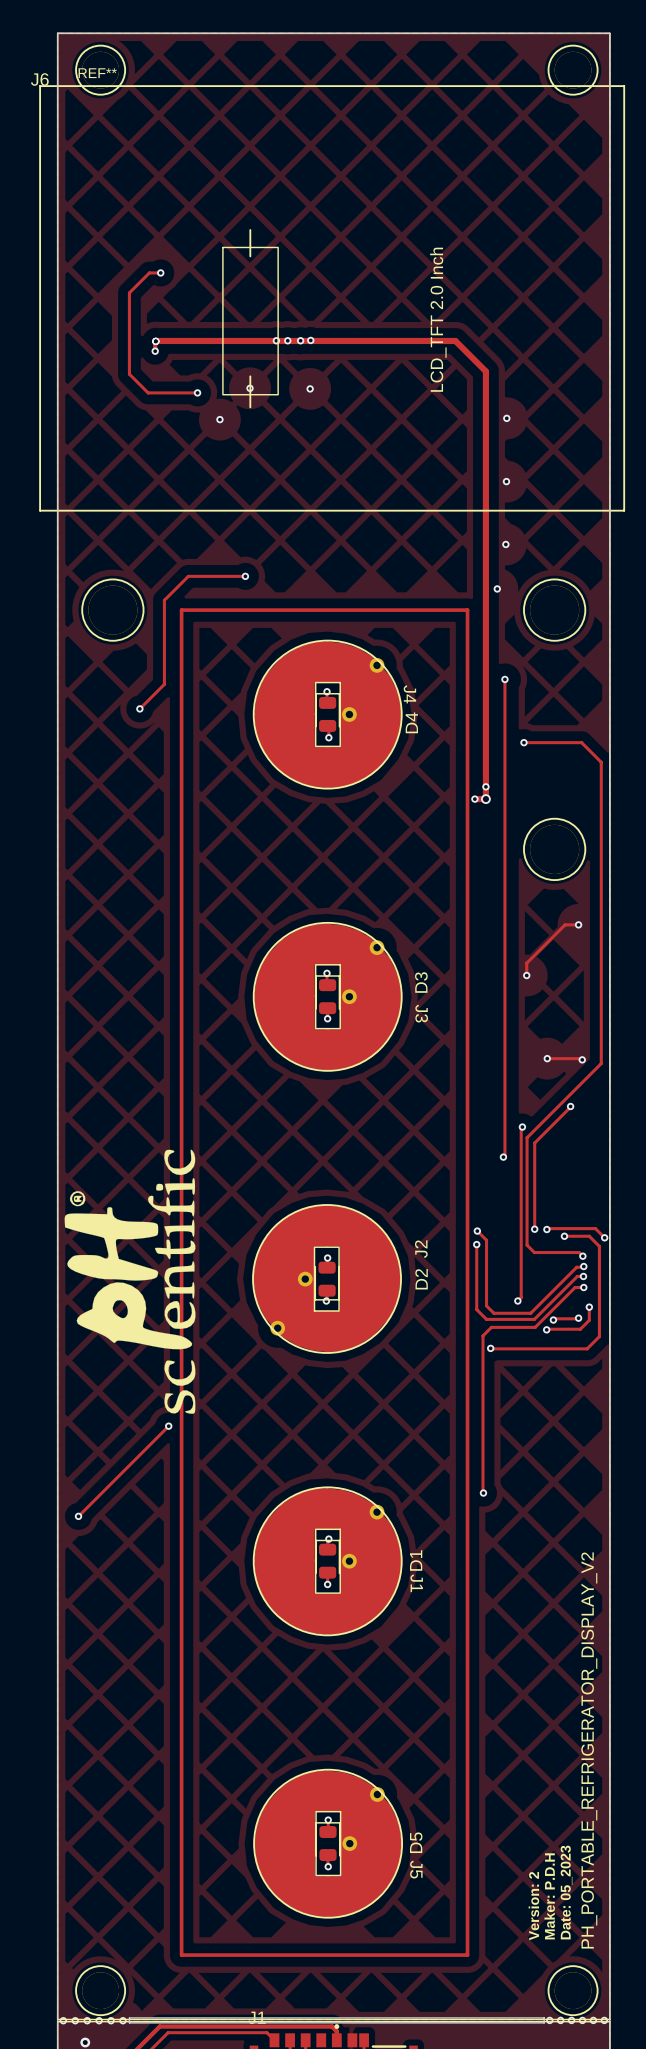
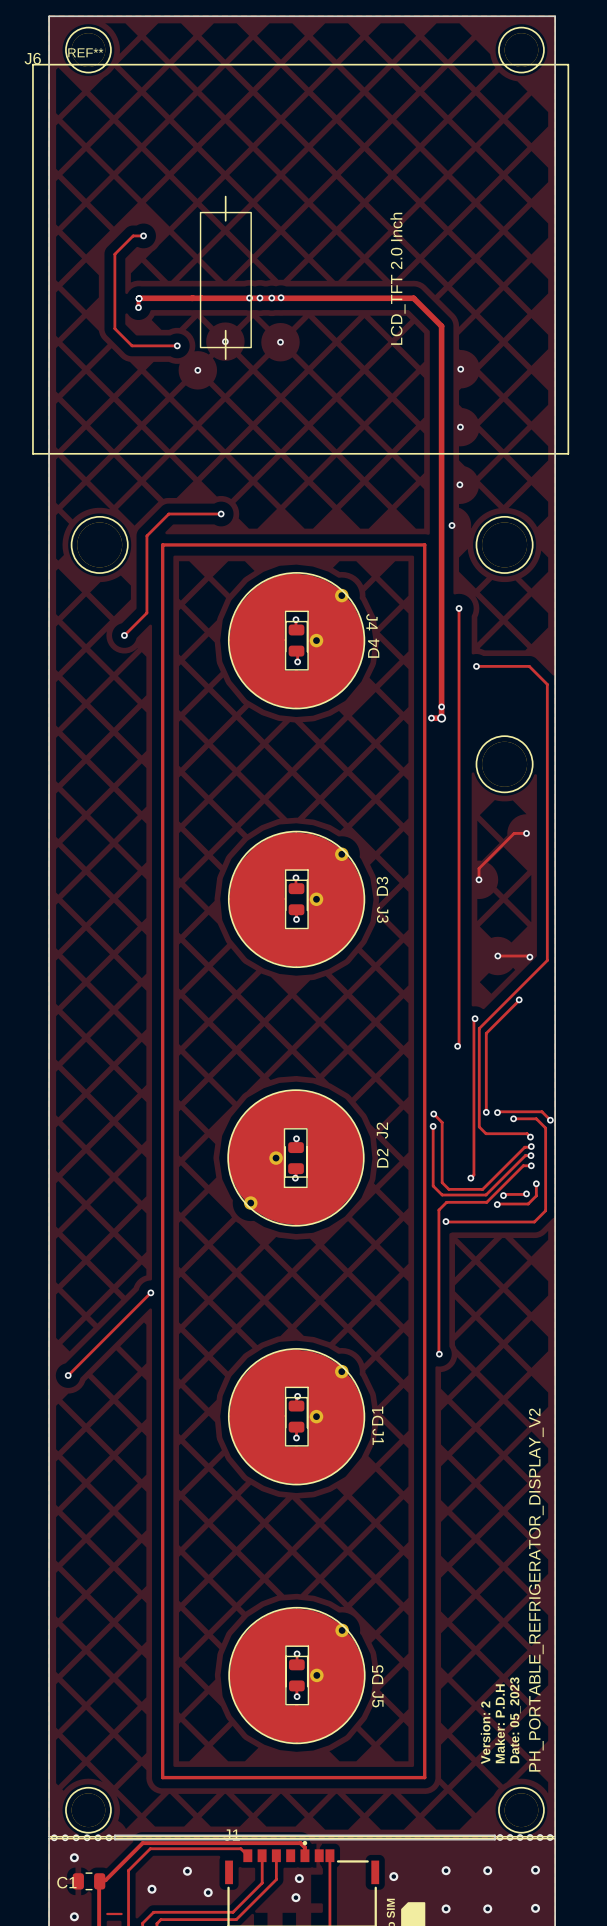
drawing: [64, 1149, 196, 1414] -> none

